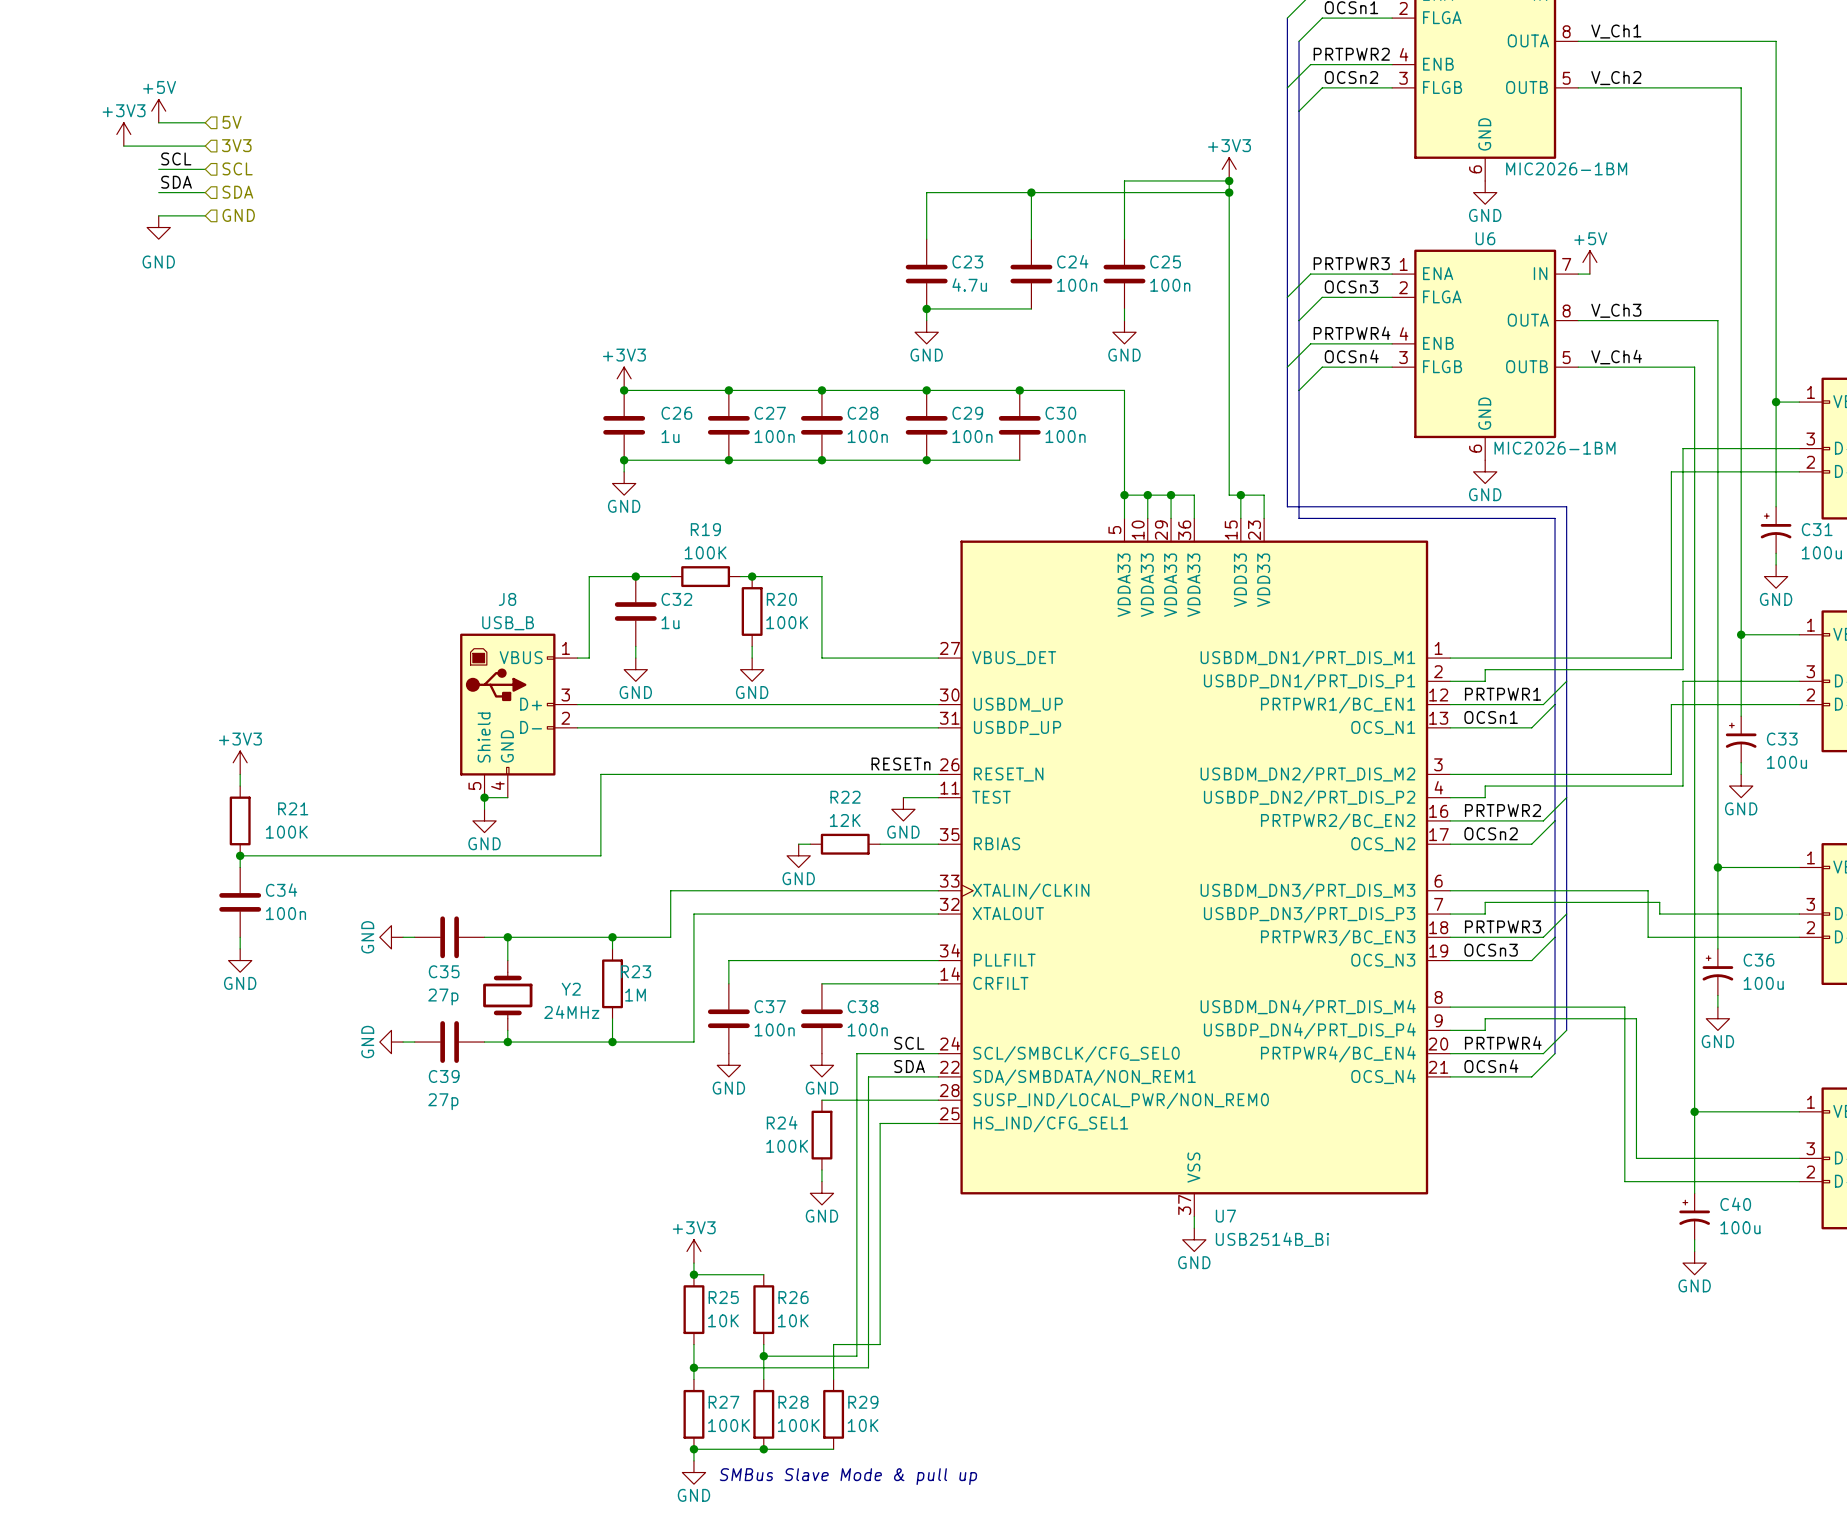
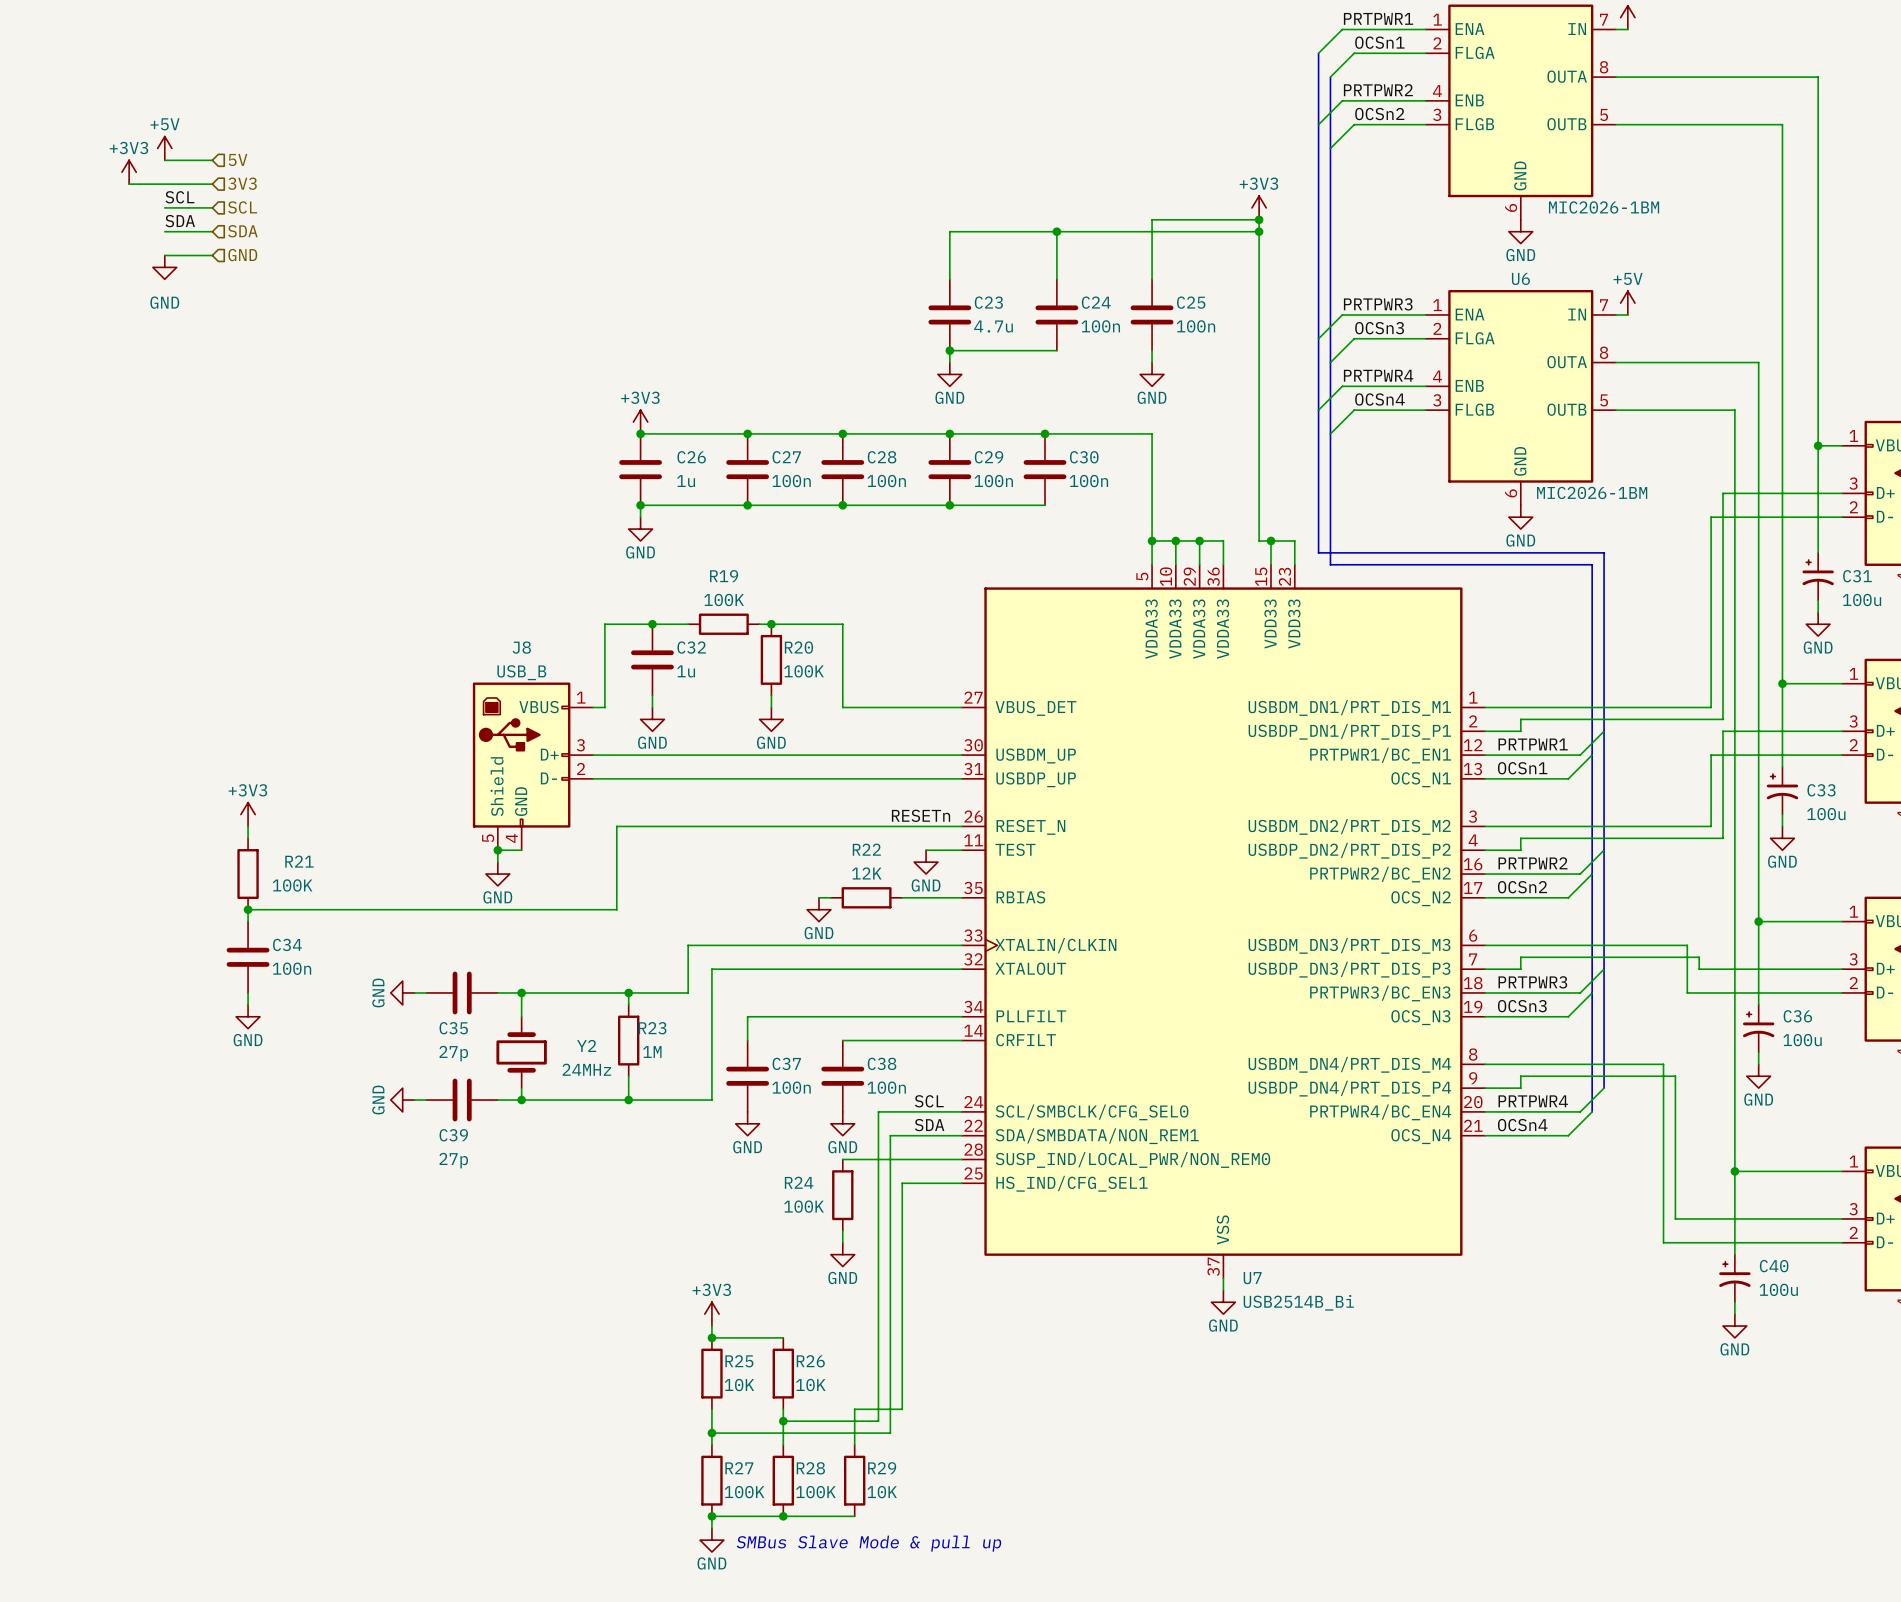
label: V_Ch1 (1616, 31) -> none
label: V_Ch2 (1616, 78) -> none
label: V_Ch3 (1616, 310) -> none
label: V_Ch4 (1616, 357) -> none

